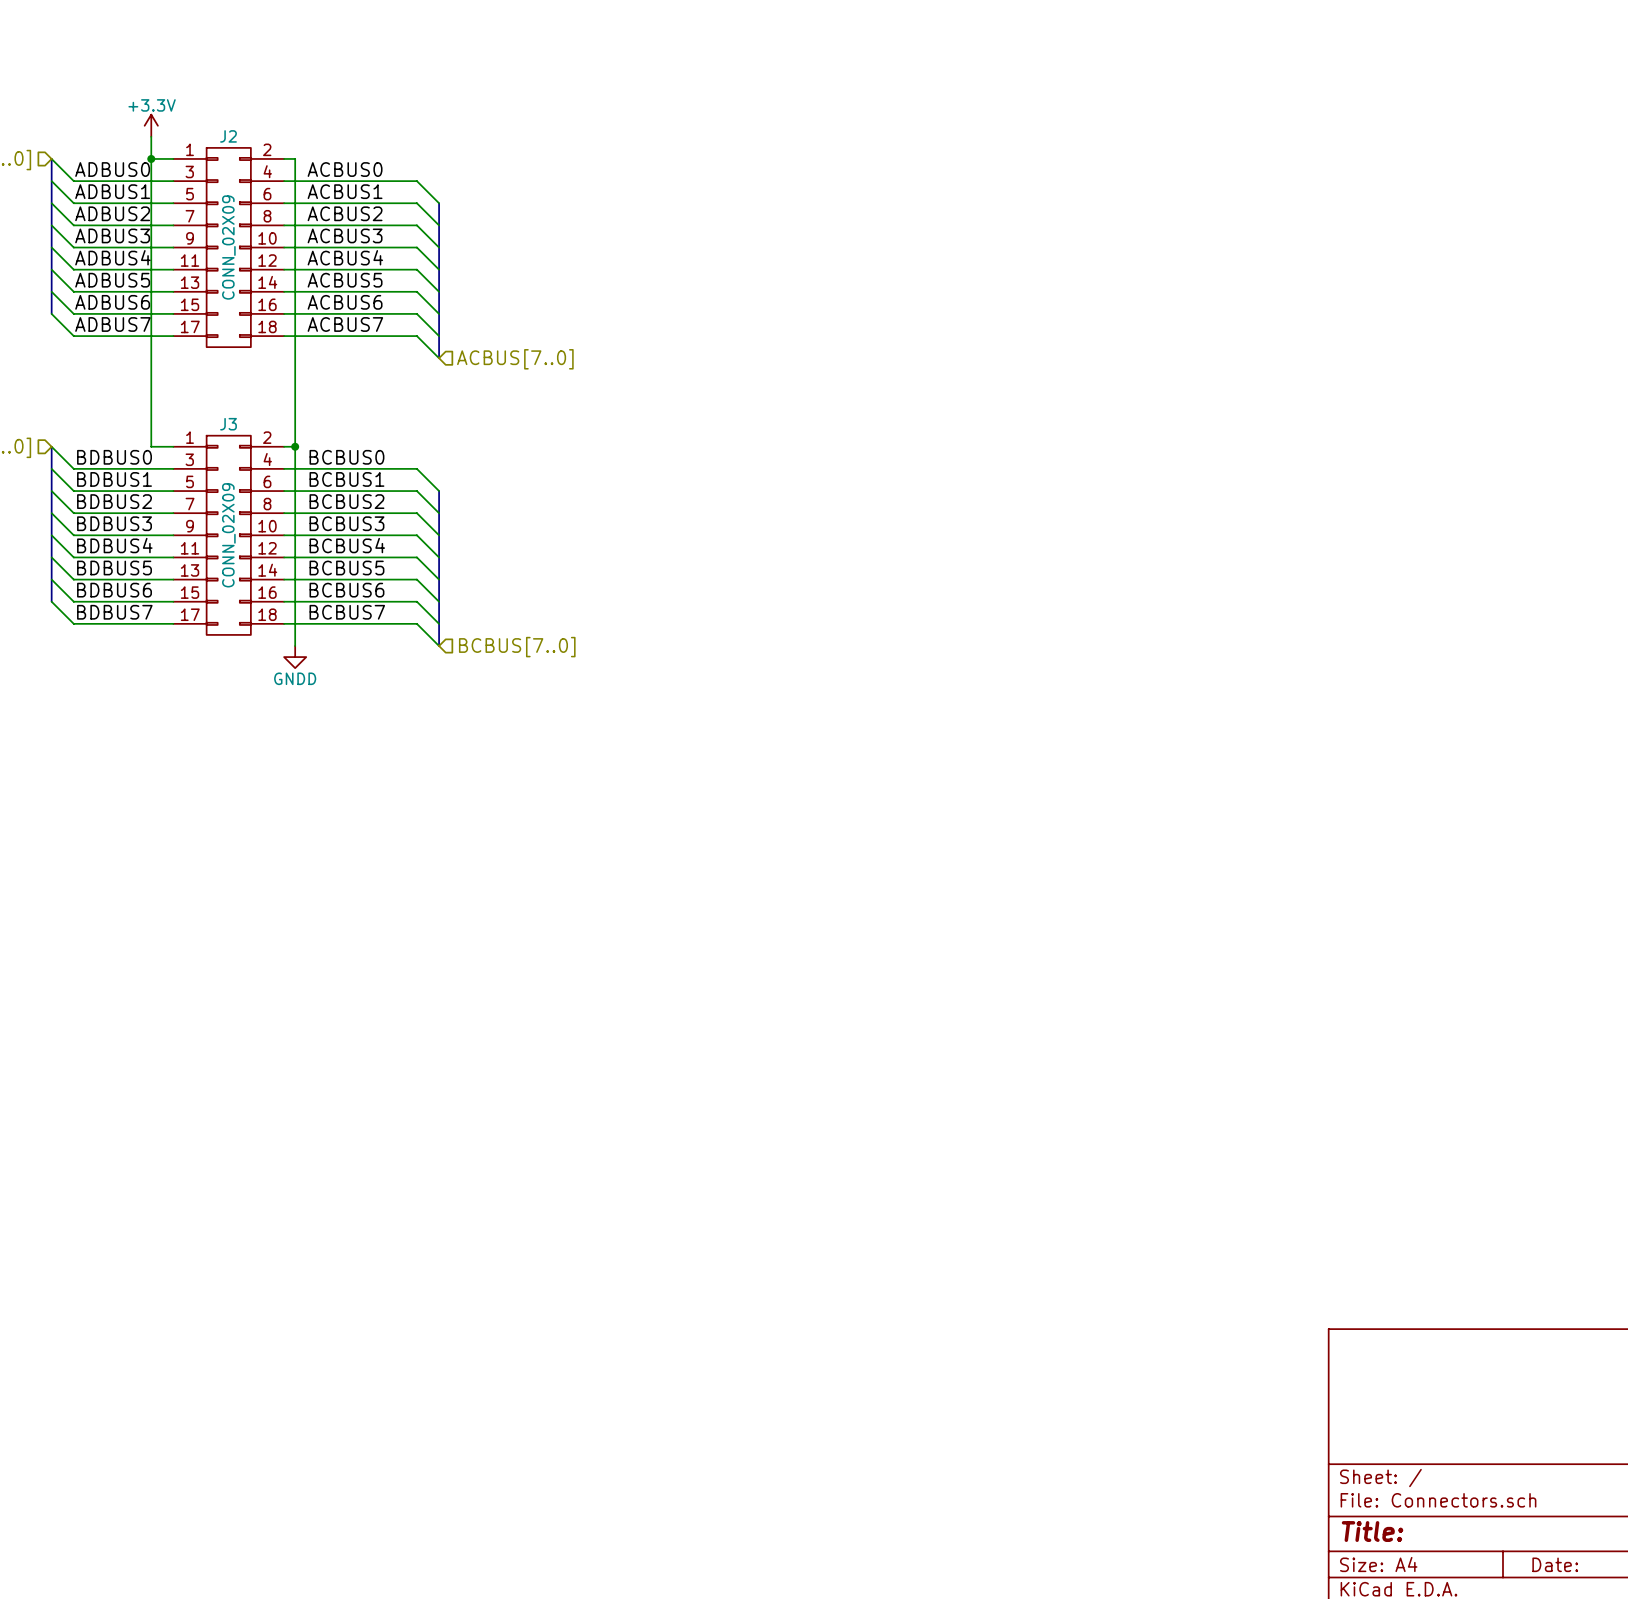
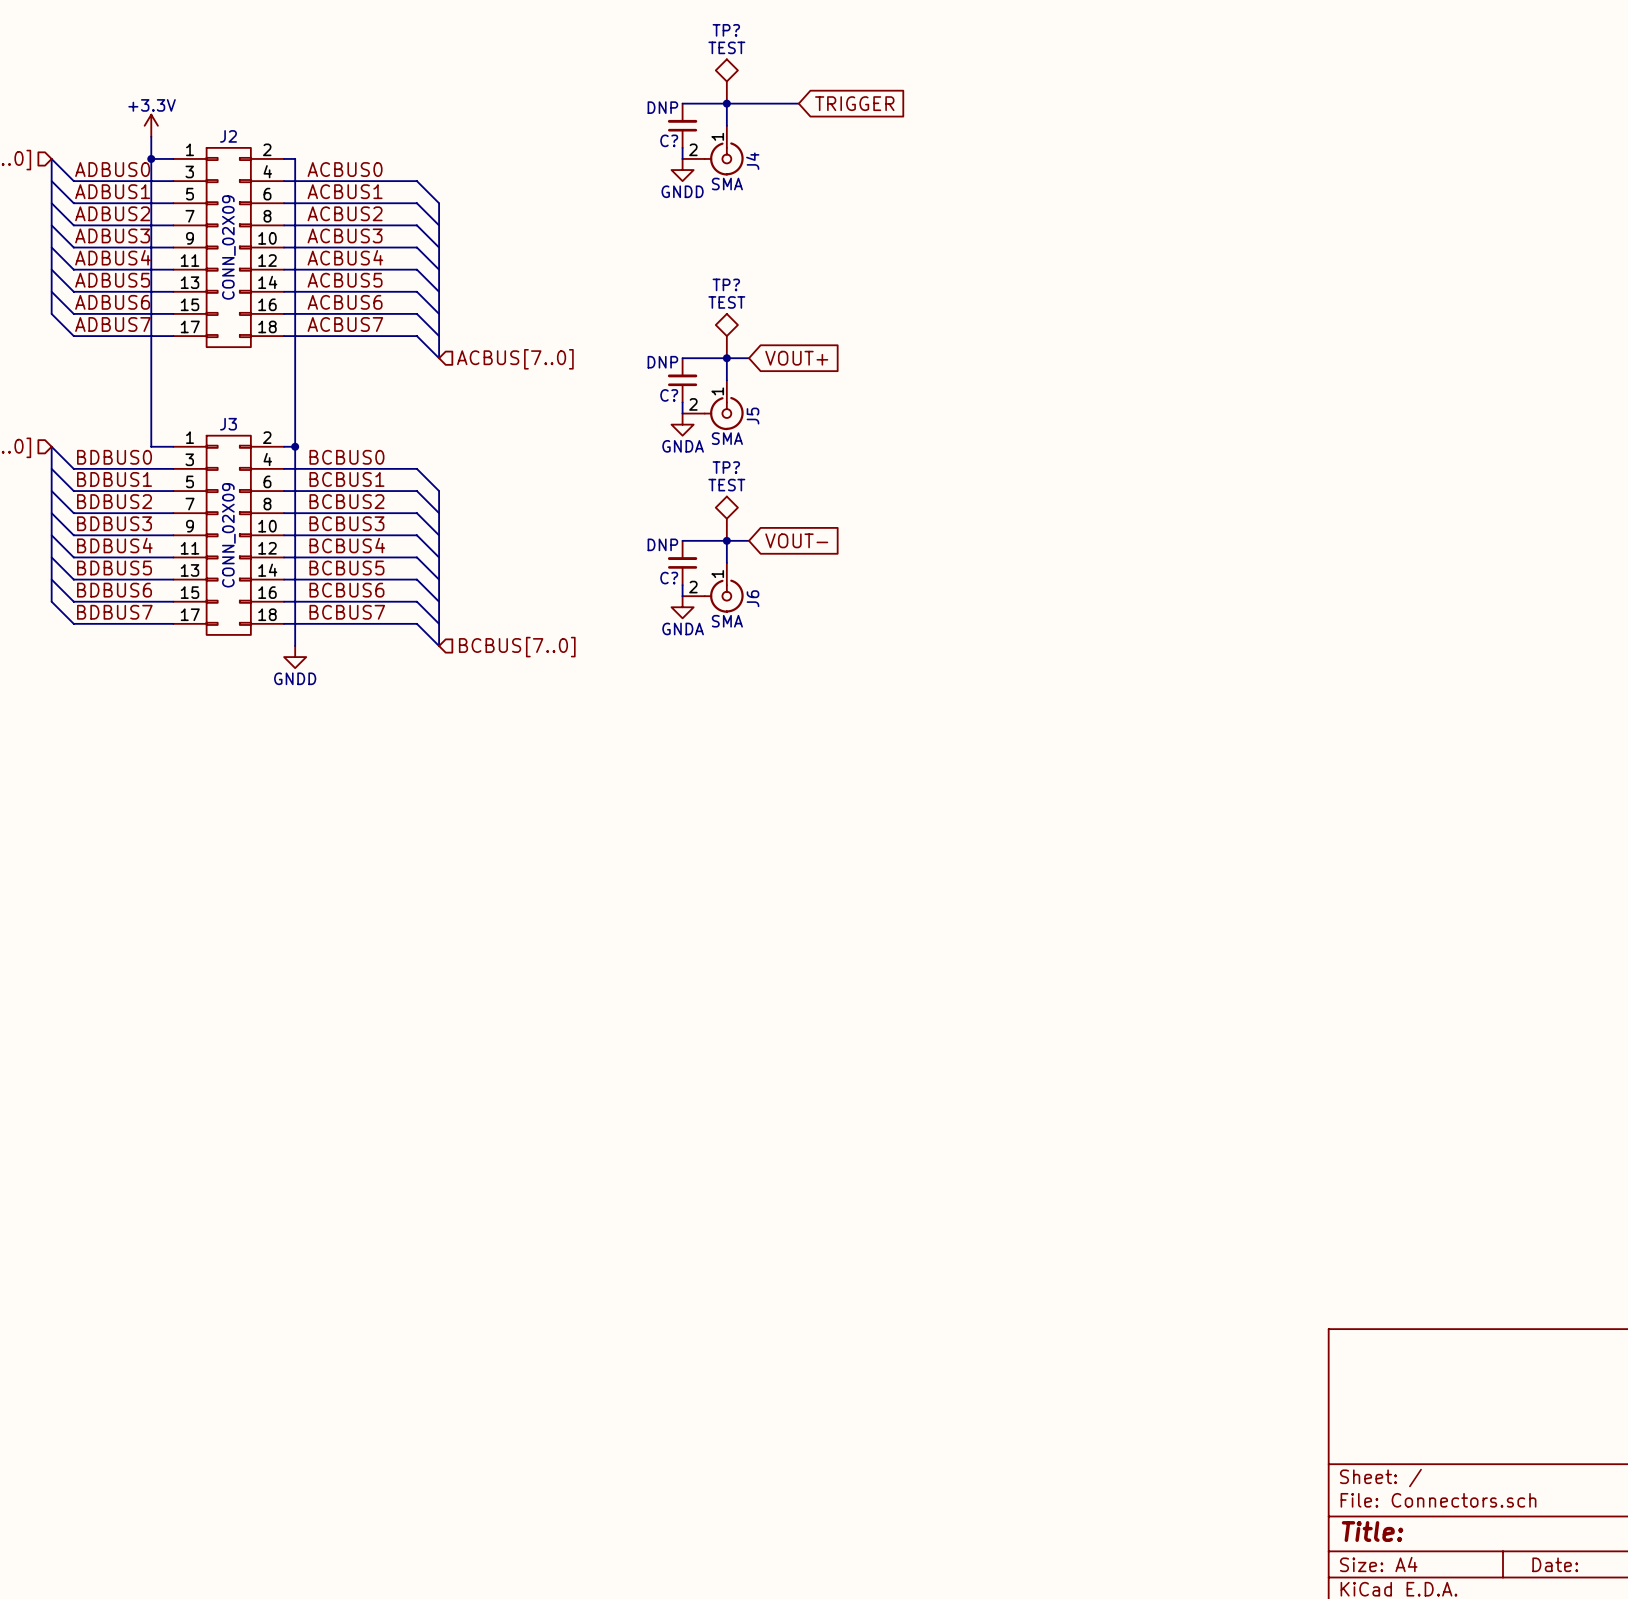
TP?: none -> TEST (726, 81)
wire: none -> (682, 103) (798, 103)
wire: none -> (726, 103) (726, 125)
junction: none -> (726, 103)
global label: none -> TRIGGER (854, 103)
C?: none -> DNP (682, 125)
wire: none -> (682, 147) (682, 158)
J4: none -> SMA (713, 150)
power symbol: none -> GNDD (682, 170)
TP?: none -> TEST (726, 336)
wire: none -> (682, 358) (748, 358)
wire: none -> (726, 358) (726, 380)
junction: none -> (726, 358)
global label: none -> VOUT+ (796, 358)
C?: none -> DNP (682, 380)
wire: none -> (682, 402) (682, 413)
J5: none -> SMA (713, 405)
power symbol: none -> GNDA (682, 424)
TP?: none -> TEST (726, 518)
wire: none -> (682, 540) (748, 540)
wire: none -> (726, 540) (726, 562)
junction: none -> (726, 540)
global label: none -> VOUT- (796, 540)
C?: none -> DNP (682, 562)
wire: none -> (682, 585) (682, 596)
J6: none -> SMA (713, 587)
power symbol: none -> GNDA (682, 607)

